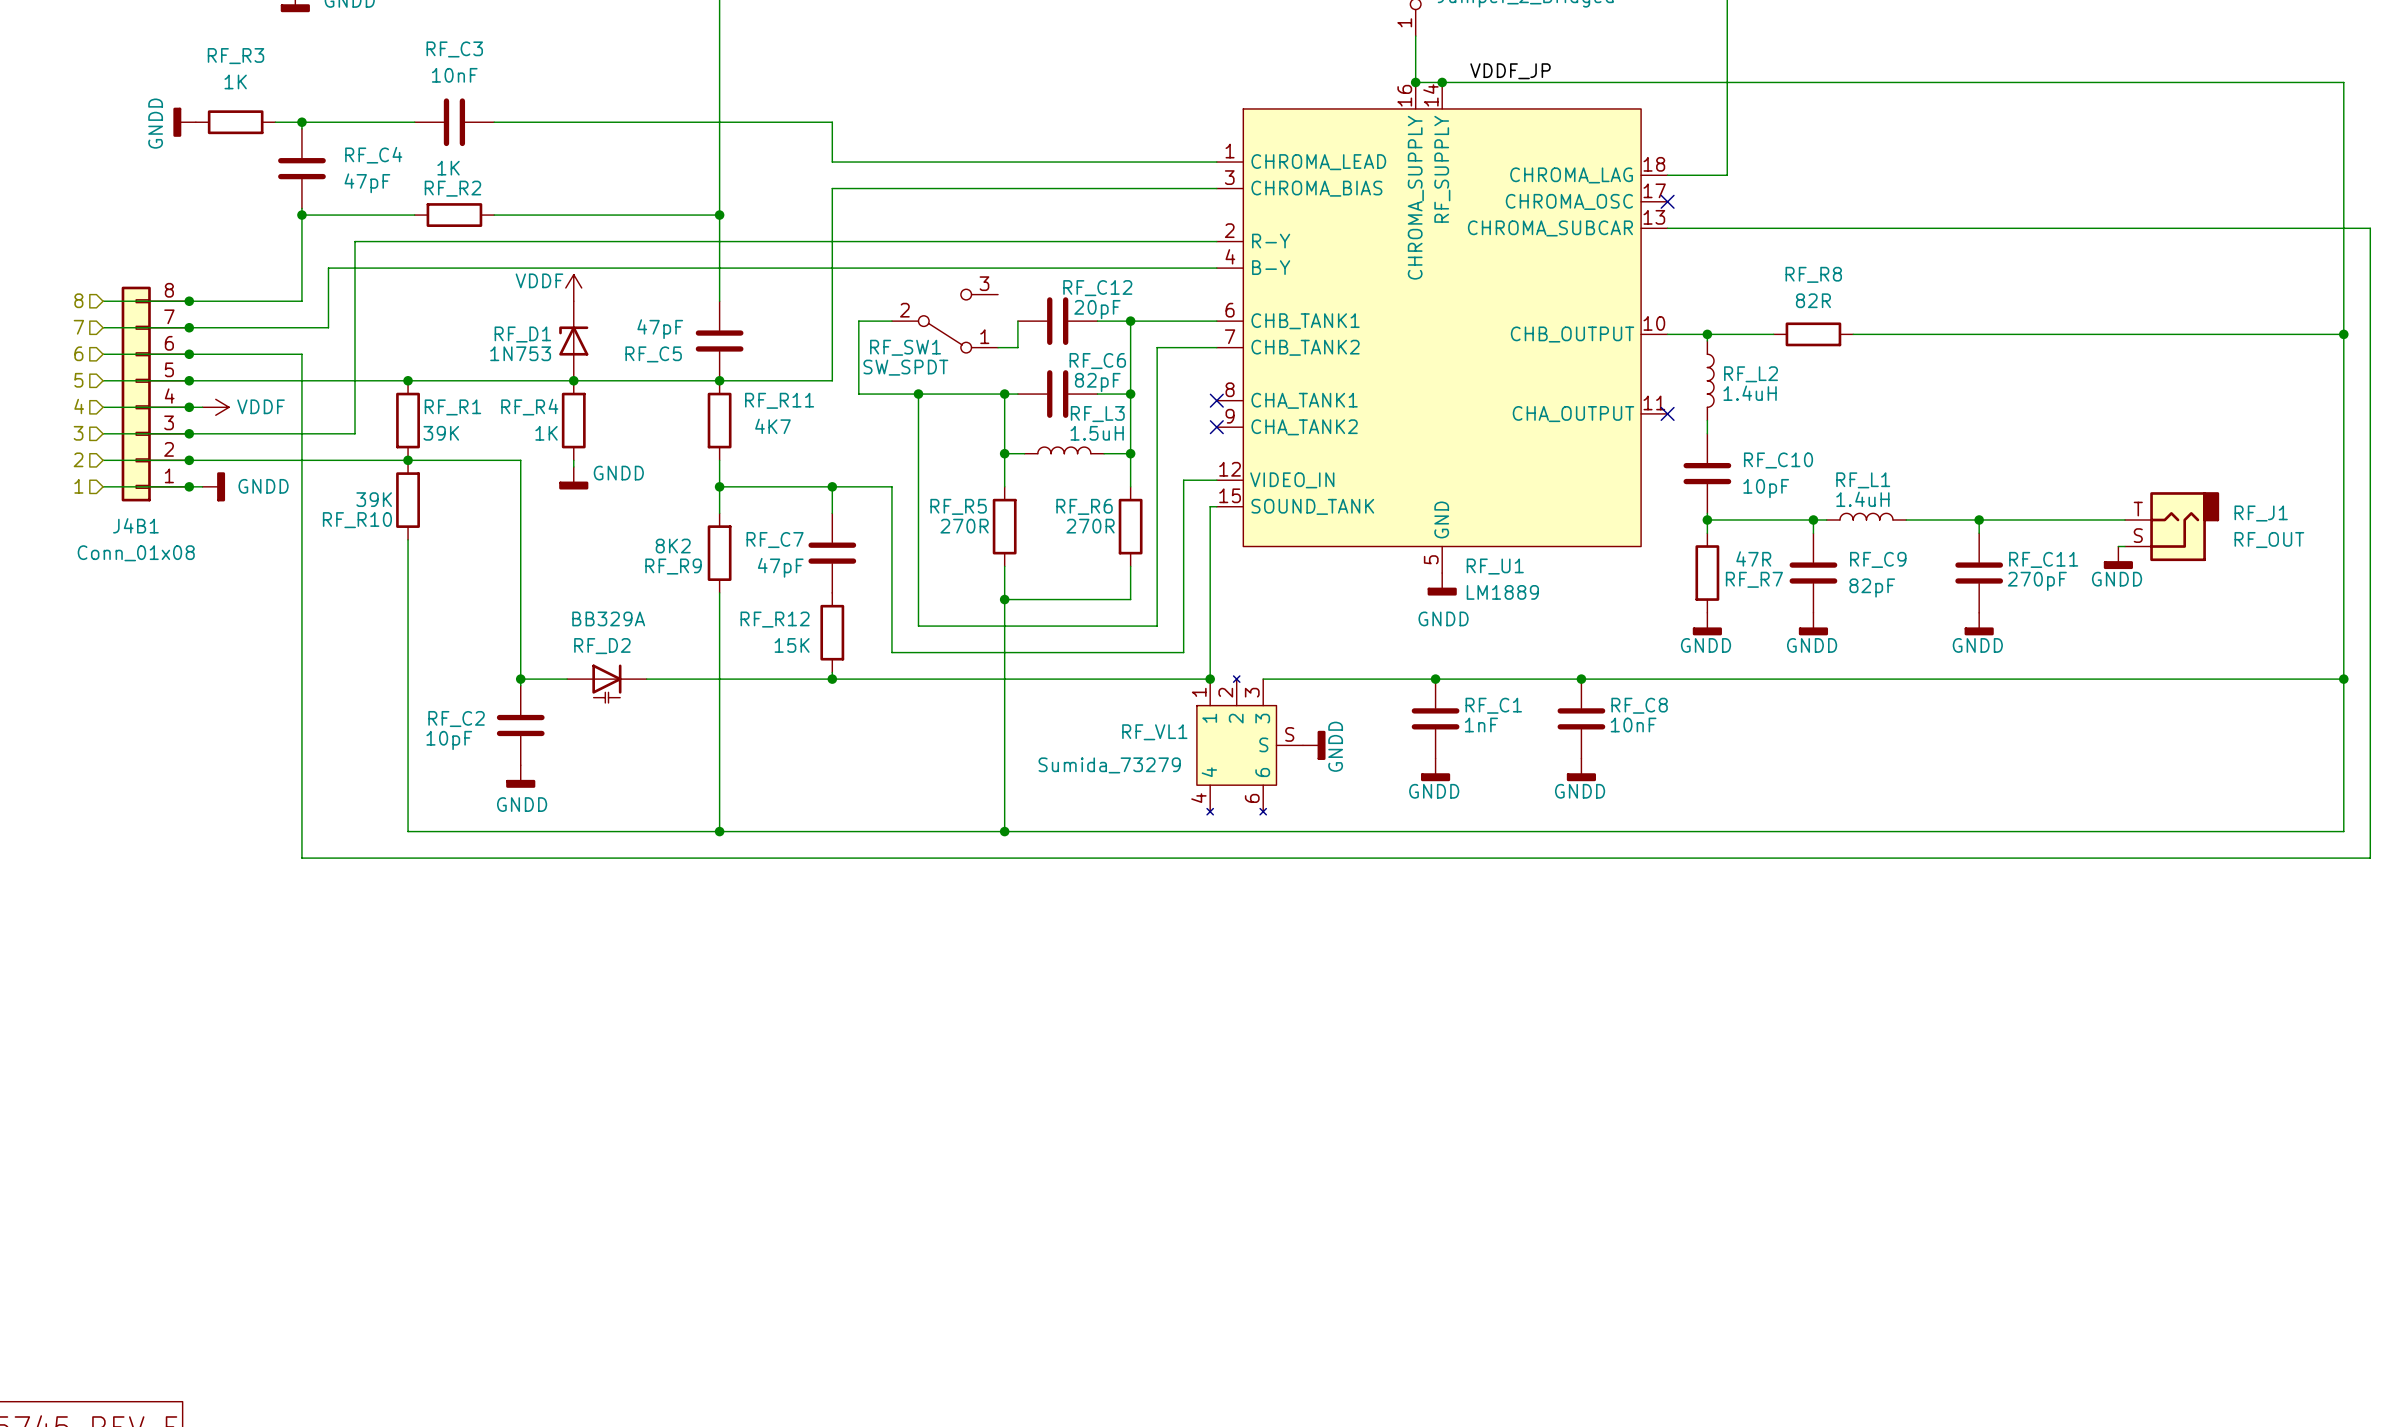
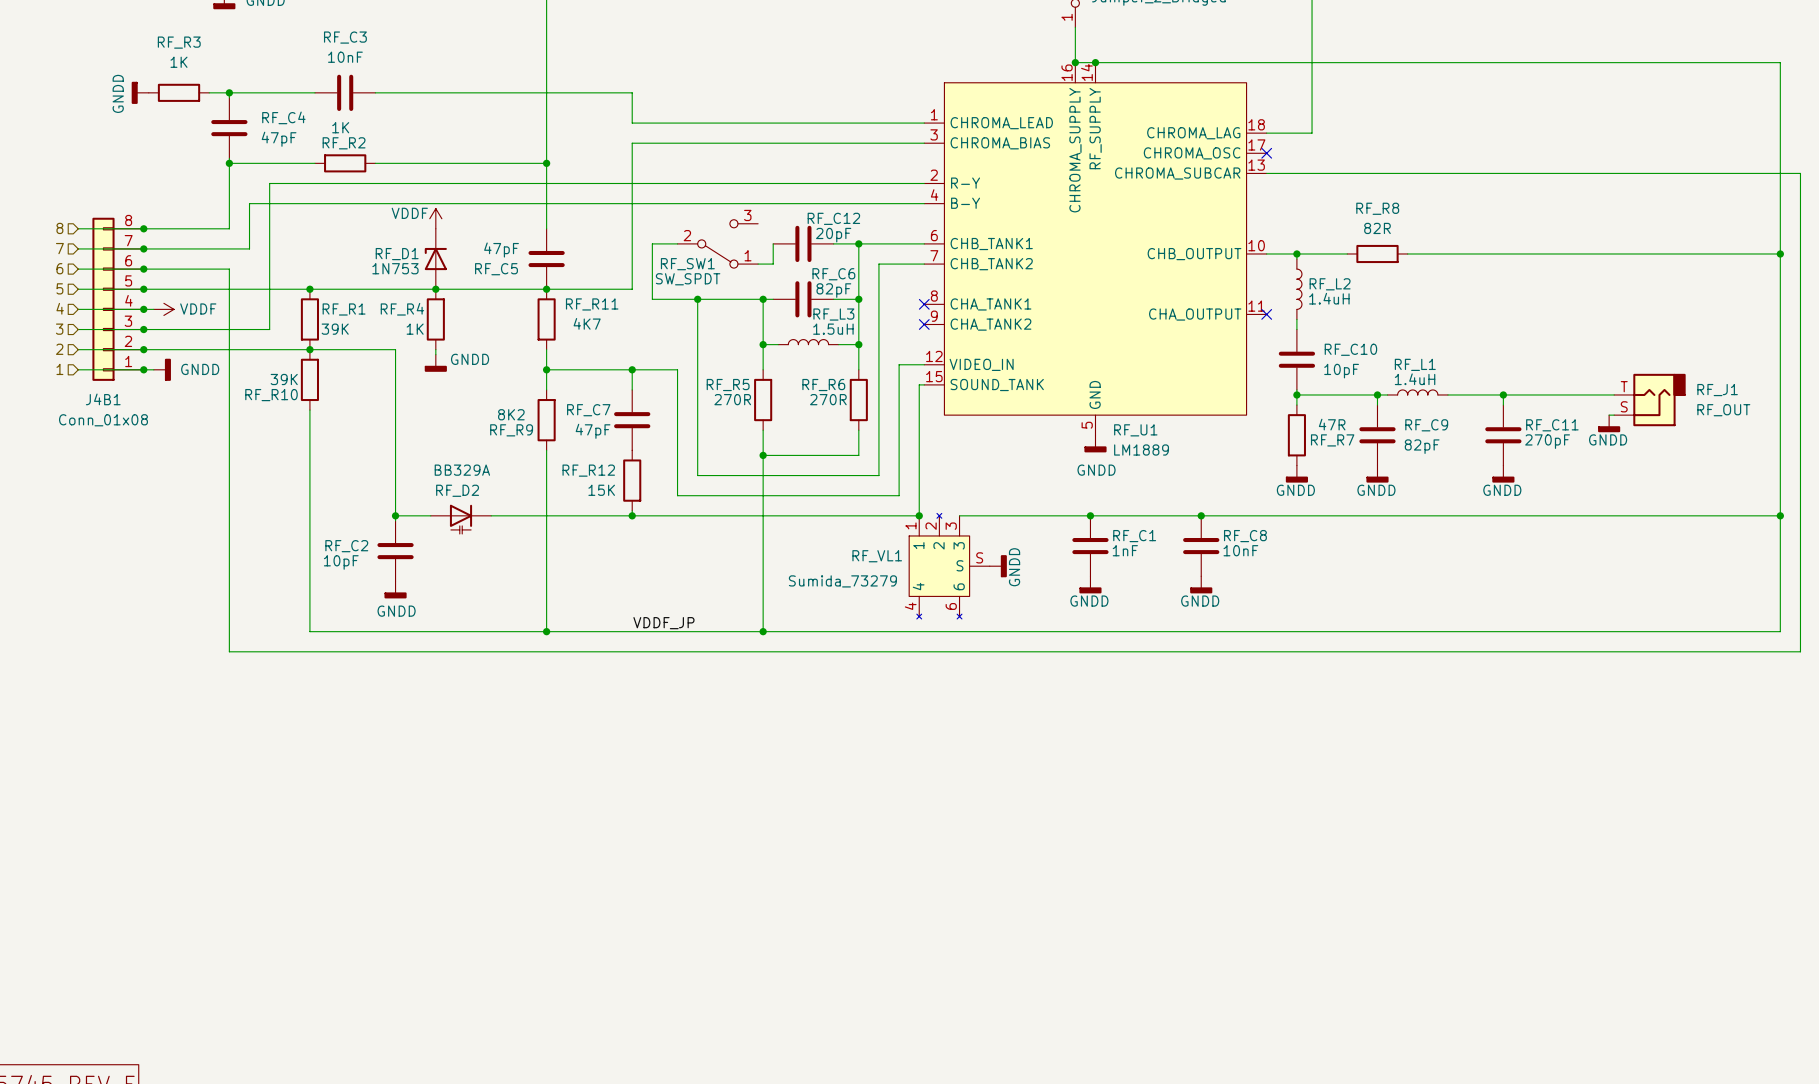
label: VDDF_JP (1510, 71) -> none
label: none -> VDDF_JP (663, 623)

